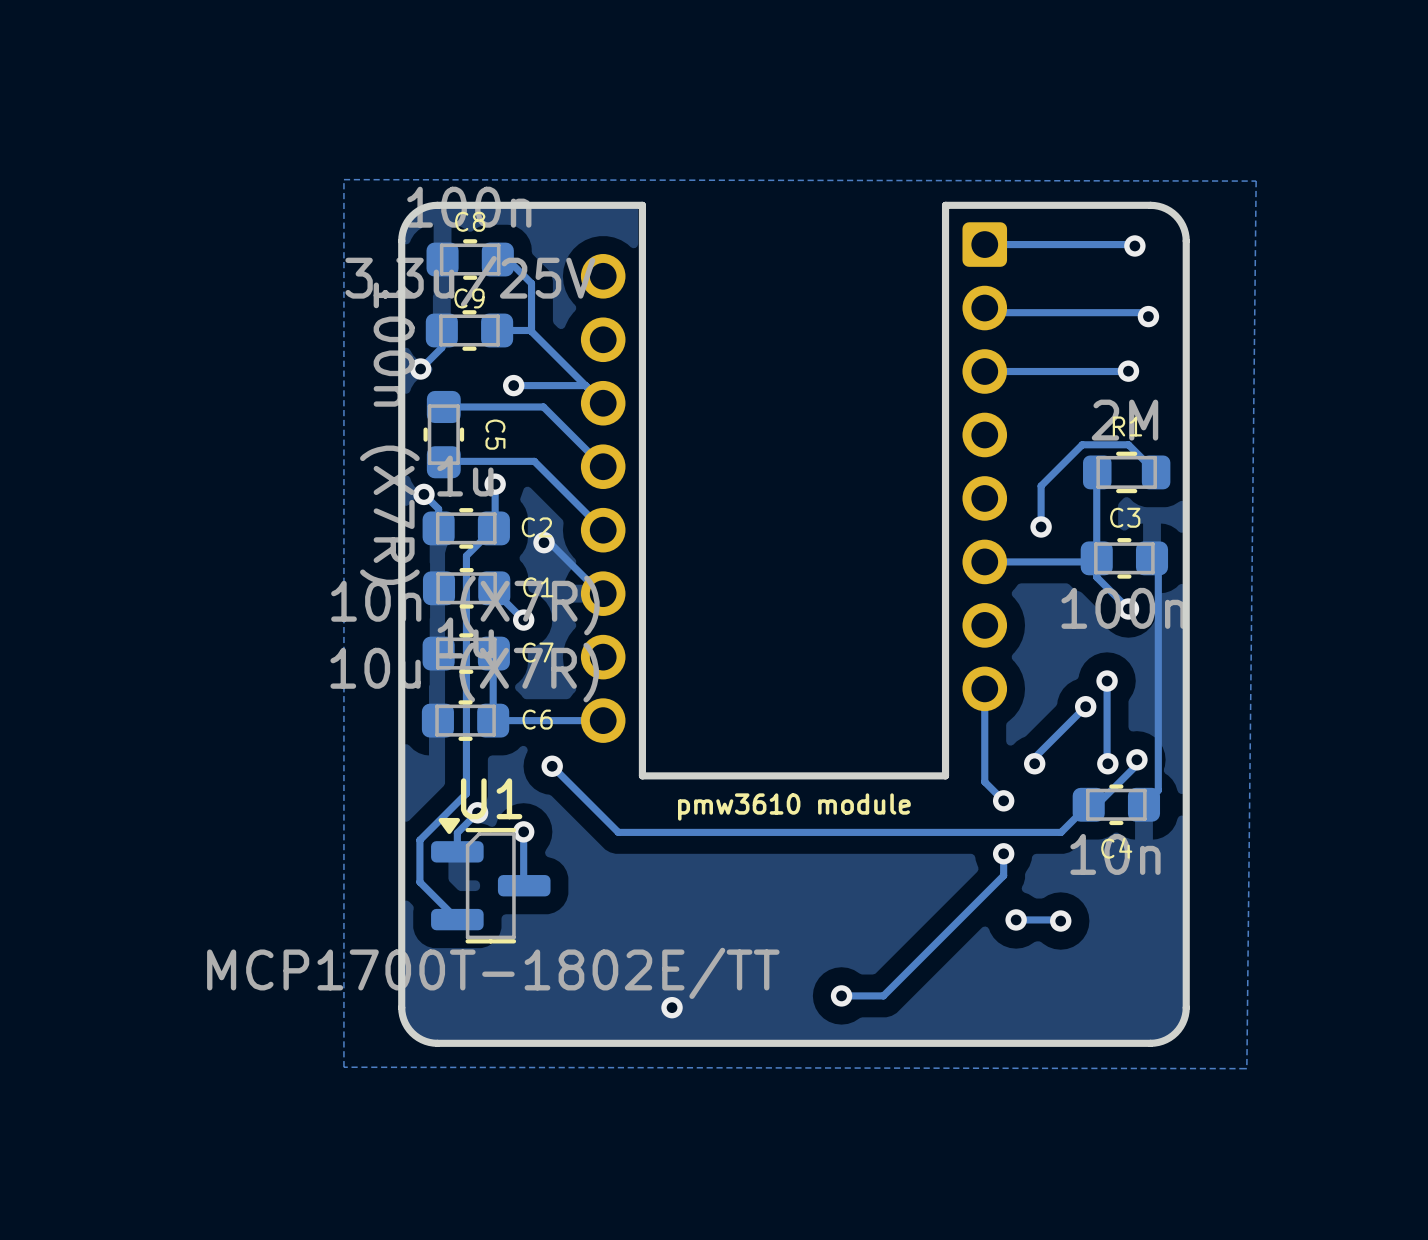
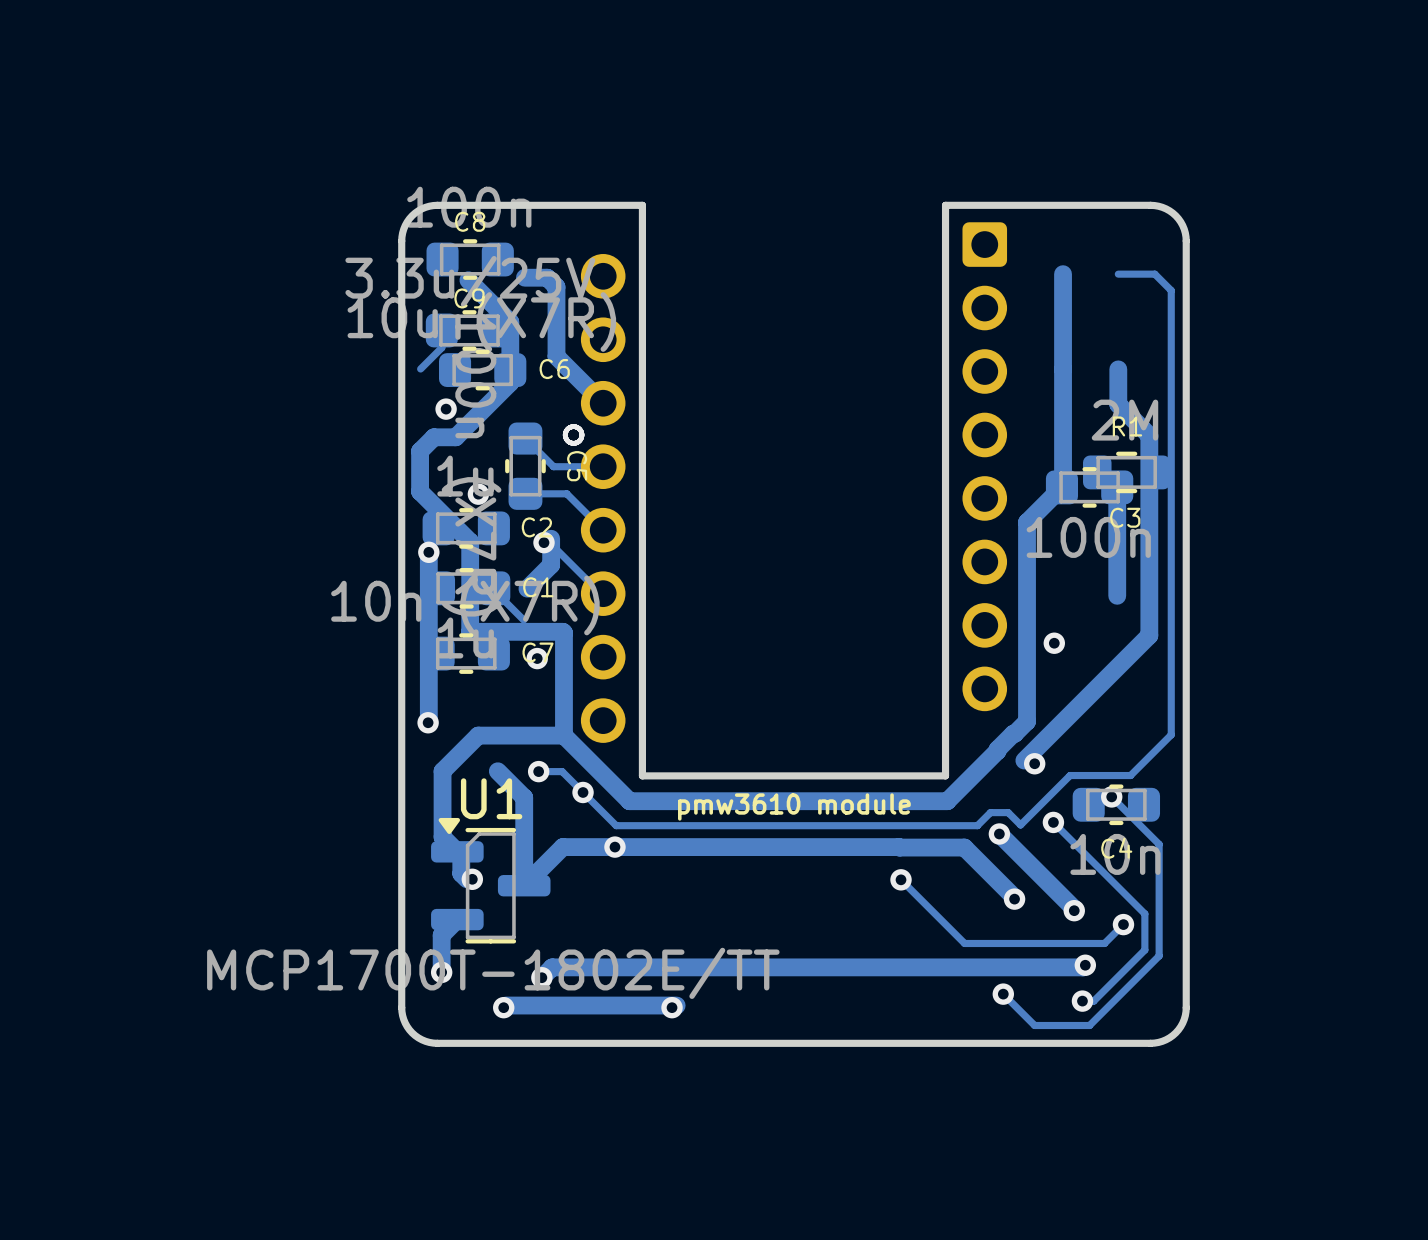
zone outline: (343, 179) (343, 1067) (1246, 1068) (1256, 181) (343, 179) -> none
track: (984, 244) (1134, 245) -> none
via: (1134, 245) -> none
track: (497, 259) (507, 259) (531, 283) (531, 331) -> none
track: none -> (1063, 274) (1063, 486) (1027, 522) (1027, 721) (947, 801) (629, 801) (563, 735)
track: none -> (1118, 274) (1154, 274) (1171, 290) (1171, 734) (1130, 775) (1070, 775) (1020, 824) (1008, 812) (990, 812) (977, 825) (616, 825) (562, 771) (538, 771)
track: none -> (469, 277) (468, 280) (510, 322) (510, 382) (455, 437) (433, 437) (420, 451) (420, 491) (470, 541) (470, 631) (563, 632) (563, 735)
track: (985, 312) (1144, 312) (1148, 316) -> none
via: (1148, 316) -> none
track: (497, 330) (530, 330) (556, 356) -> (524, 277) (547, 277) (556, 286) (556, 356)
track width: thin (556, 356) (603, 403) -> thick (556, 356) (603, 403)
via: (420, 369) -> none
track: none -> (1118, 369) (1118, 404) (1149, 435) (1149, 635) (1024, 760)
track: (1128, 371) (984, 371) -> none
via: (1128, 371) -> none
via: (513, 385) -> none
track: (585, 385) (513, 385) -> none
track: (443, 406) (543, 406) (603, 466) -> (525, 438) (553, 466) (603, 466)
via: none -> (446, 409)
C5 position: (443, 434) -> (525, 466)
via: none -> (573, 434)
track: (443, 462) (534, 461) (566, 493) -> (525, 493) (566, 493)
track: (1097, 472) (1096, 577) (1128, 608) -> none
track: (1156, 472) (1128, 444) (1082, 444) (1041, 485) (1041, 526) -> none
track: (495, 484) (495, 527) (466, 555) (466, 793) (419, 840) (419, 882) (457, 919) -> (441, 972) (441, 935) (457, 919)
via position: (495, 484) -> (478, 494)
track: none -> (1117, 487) (1117, 595)
via: (423, 494) -> none
via: (1041, 526) -> none
track: none -> (551, 538) (551, 564) (527, 588)
track: none -> (428, 552) (428, 722)
via: none -> (428, 552)
track: (1096, 558) (1093, 561) (984, 561) (985, 564) -> none
C3 position: (1124, 558) -> (1089, 487)
track: (1152, 558) (1158, 564) (1158, 790) (1143, 804) -> none
via: (1128, 608) -> none
via position: (523, 620) -> (537, 658)
via: none -> (1054, 643)
track: (493, 653) (493, 720) (603, 720) -> none
track: (1107, 681) (1107, 763) -> none
via: (1107, 681) -> none
track: (984, 688) (984, 781) (1003, 800) -> none
track: (1085, 706) (1035, 757) (1035, 763) -> none
via: (1085, 706) -> none
C6 position: (465, 720) -> (482, 370)
via: none -> (428, 722)
track: none -> (563, 735) (478, 735) (442, 771) (442, 837) (461, 855) (461, 873) (466, 879) (472, 879)
track: (1136, 759) (1136, 764) (1097, 804) (1088, 804) (1061, 832) (618, 832) (552, 766) -> none
via: (1136, 759) -> none
via: (1107, 763) -> none
via position: (552, 766) -> (538, 771)
track: none -> (497, 771) (524, 797) (524, 885) (562, 847) (899, 847)
via: none -> (583, 792)
track: none -> (1111, 796) (1159, 844) (1159, 955) (1089, 1025) (1034, 1025) (1003, 994)
via: none -> (1111, 796)
via: (1003, 800) -> none
track: (477, 812) (457, 832) (457, 851) -> none
via: (477, 812) -> none
track: none -> (1053, 822) (1144, 913) (1144, 950) (1093, 1001) (1082, 1001)
via: none -> (1053, 822)
via: (523, 831) -> none
track: none -> (999, 834) (1074, 910)
via: none -> (614, 847)
track: none -> (899, 847) (964, 847) (1014, 899)
track: (1003, 853) (1003, 875) (883, 995) (841, 995) -> none
via position: (1003, 853) -> (999, 834)
via: none -> (472, 879)
track: none -> (901, 879) (964, 943) (1104, 943) (1123, 924)
via: none -> (901, 879)
track: (1016, 919) (1060, 921) -> none
via position: (1016, 919) -> (1014, 899)
via position: (1060, 921) -> (1074, 910)
via: none -> (1123, 924)
track: none -> (1085, 965) (1083, 967) (552, 967) (541, 977)
via: none -> (1085, 965)
via: none -> (441, 972)
via: none -> (541, 977)
via: none -> (1003, 994)
via: (841, 995) -> none
via: none -> (1082, 1001)
track: none -> (676, 1005) (505, 1005) (503, 1007)
via: none -> (503, 1007)

